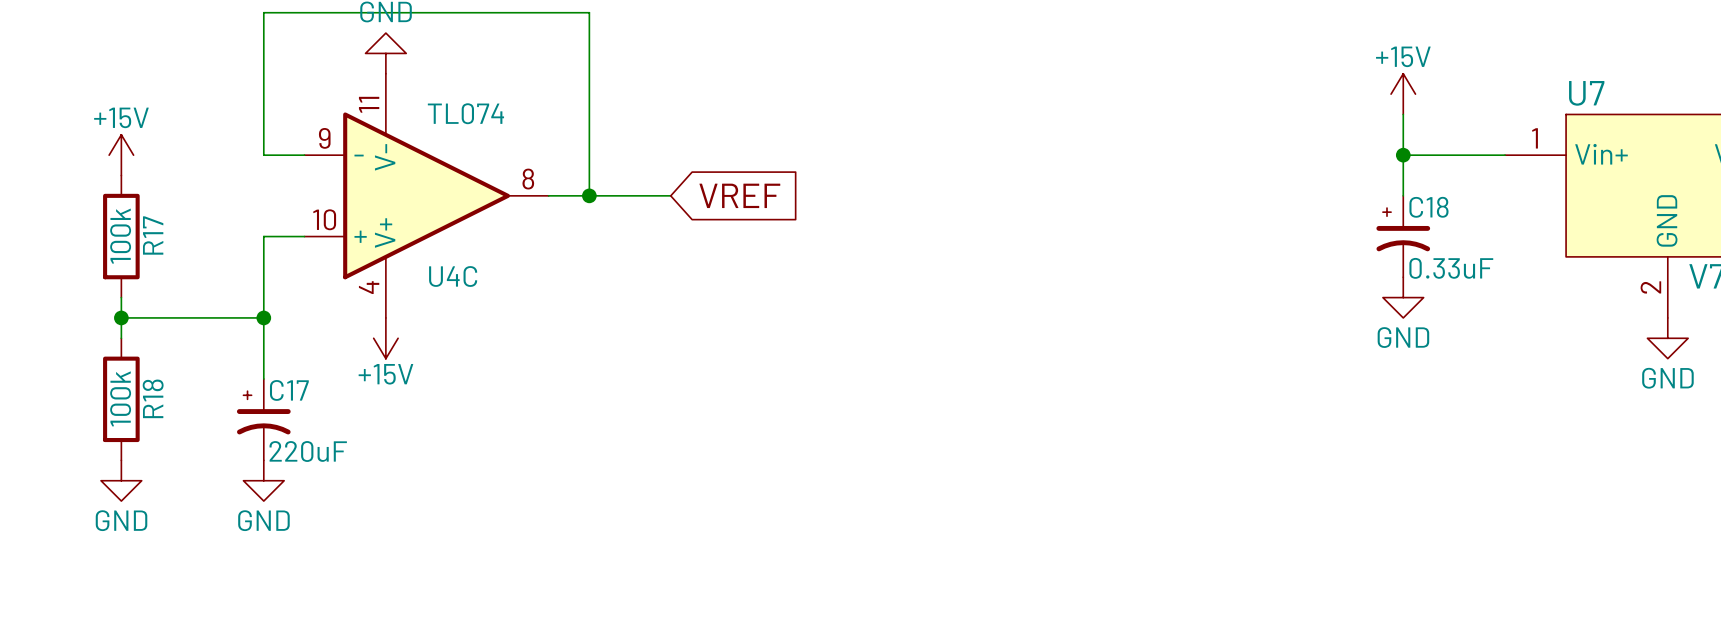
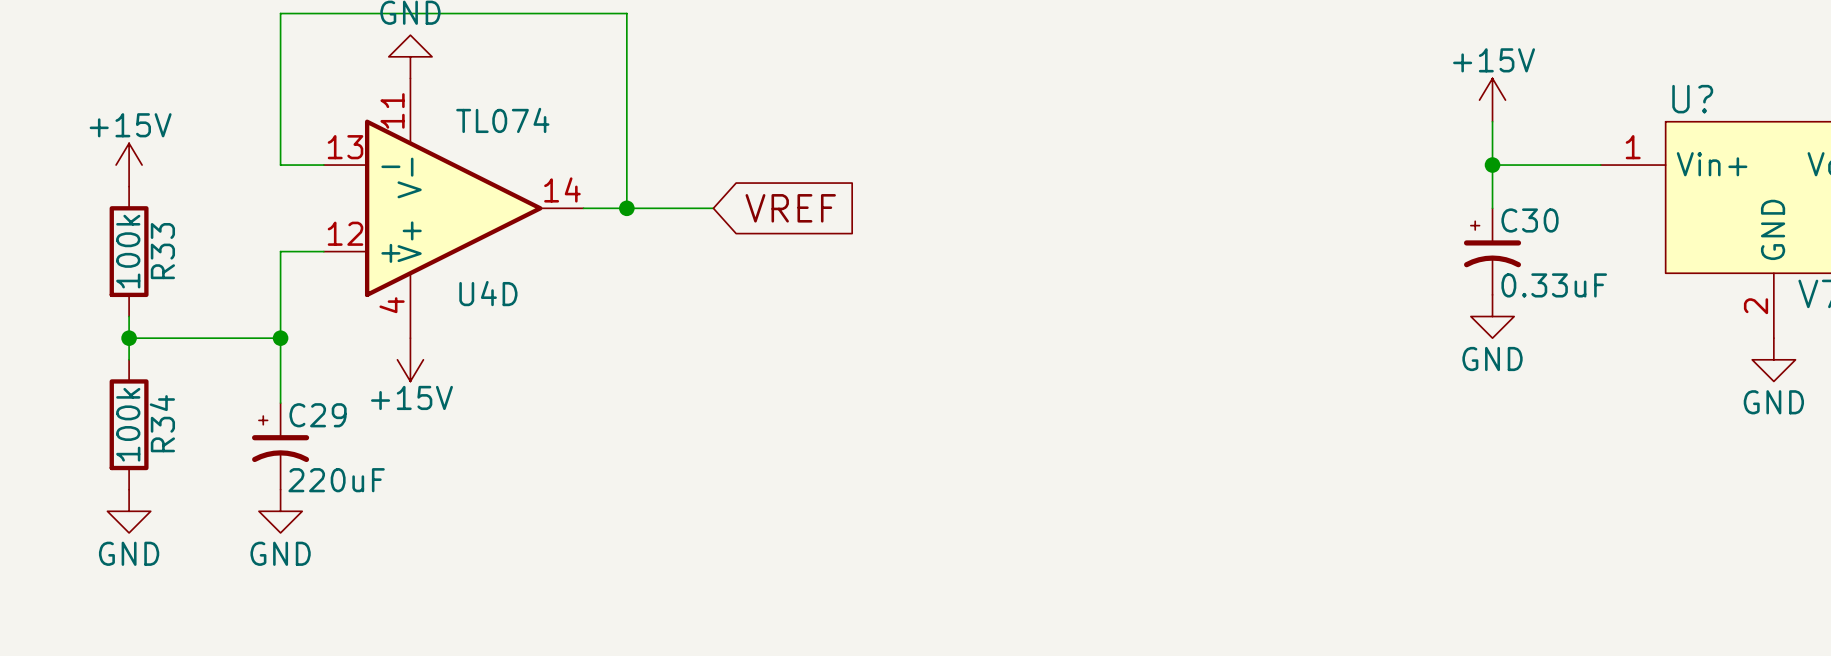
U7 name: U7 (1586, 93) -> U? (1692, 99)
U4C pin number: 9 (324, 138) -> 13 (345, 147)
U4C pin number: 8 (528, 179) -> 14 (562, 189)
C18 name: C18 (1428, 207) -> C30 (1529, 220)
U4C pin number: 10 (324, 219) -> 12 (345, 233)
R17 name: R17 (153, 235) -> R33 (162, 251)
U4C name: U4C (453, 276) -> U4D (488, 293)
C17 name: C17 (289, 390) -> C29 (318, 415)
R18 name: R18 (153, 398) -> R34 (162, 423)

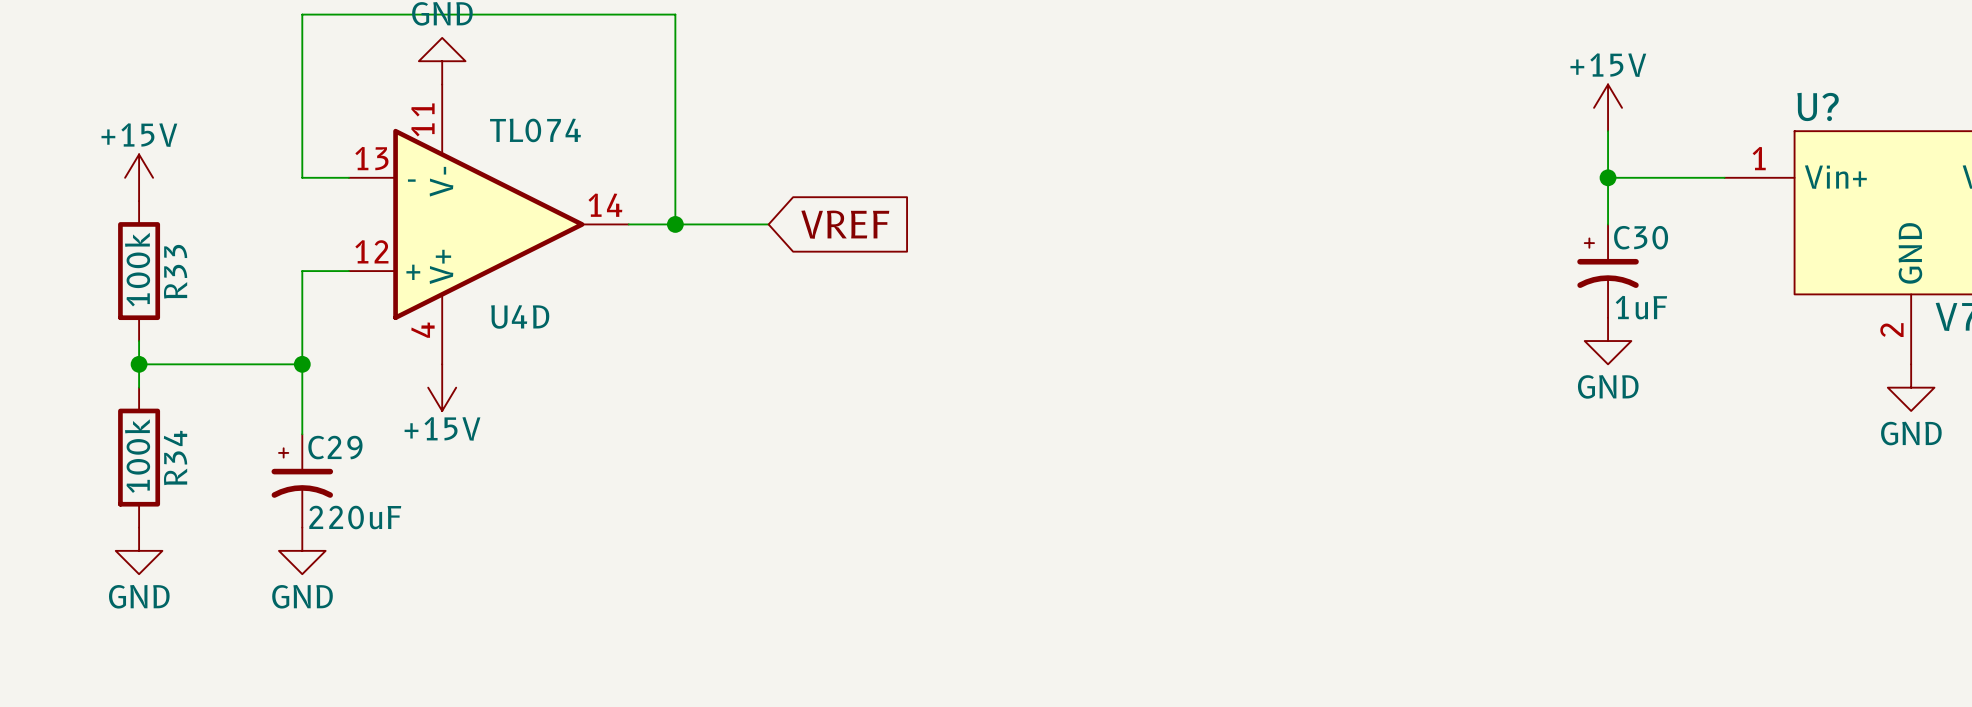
C30 value: 0.33uF (1554, 285) -> 1uF (1641, 307)

